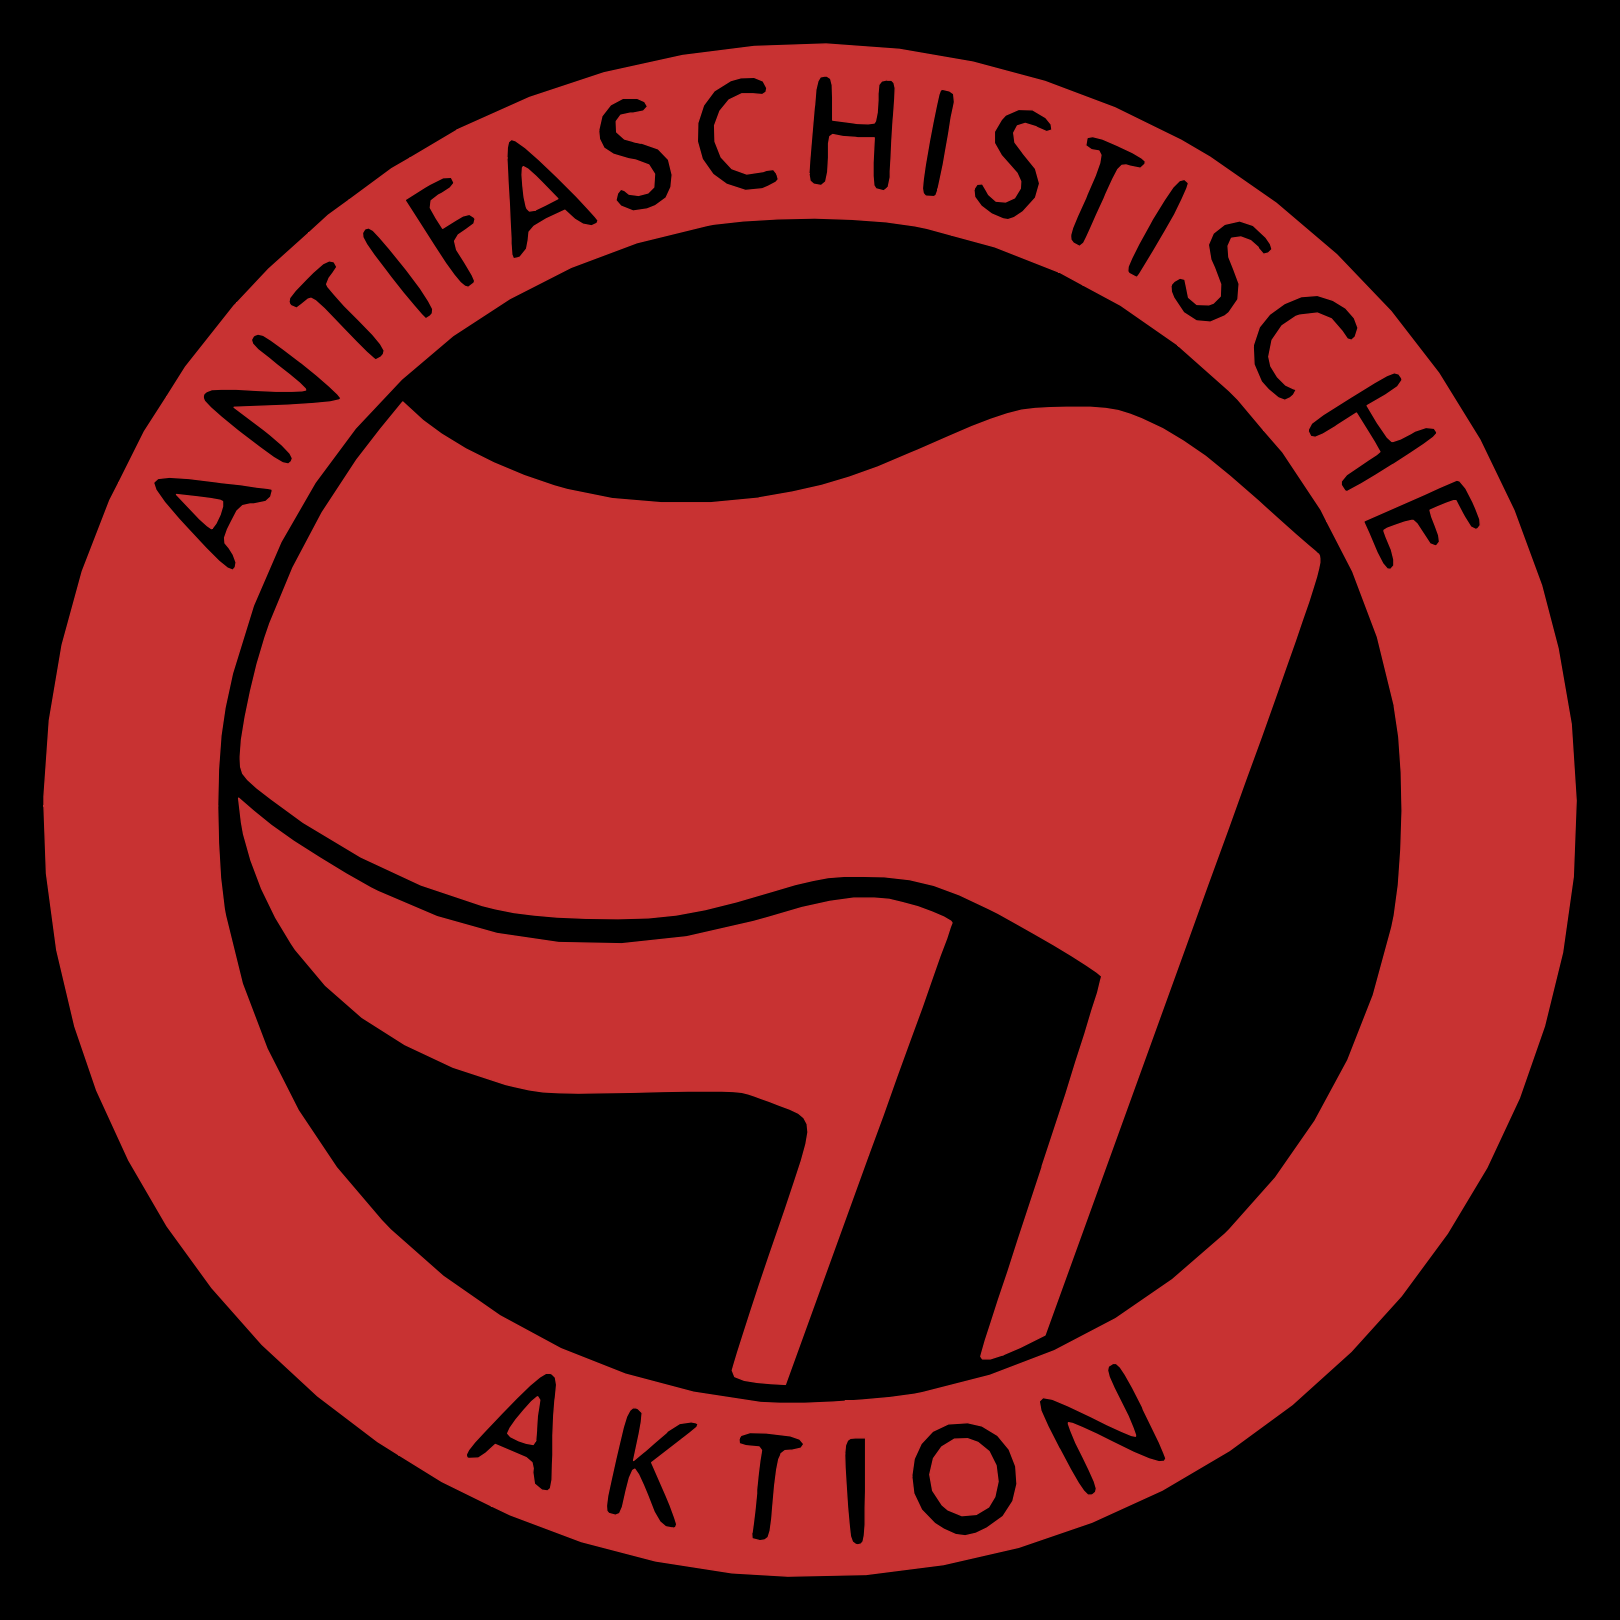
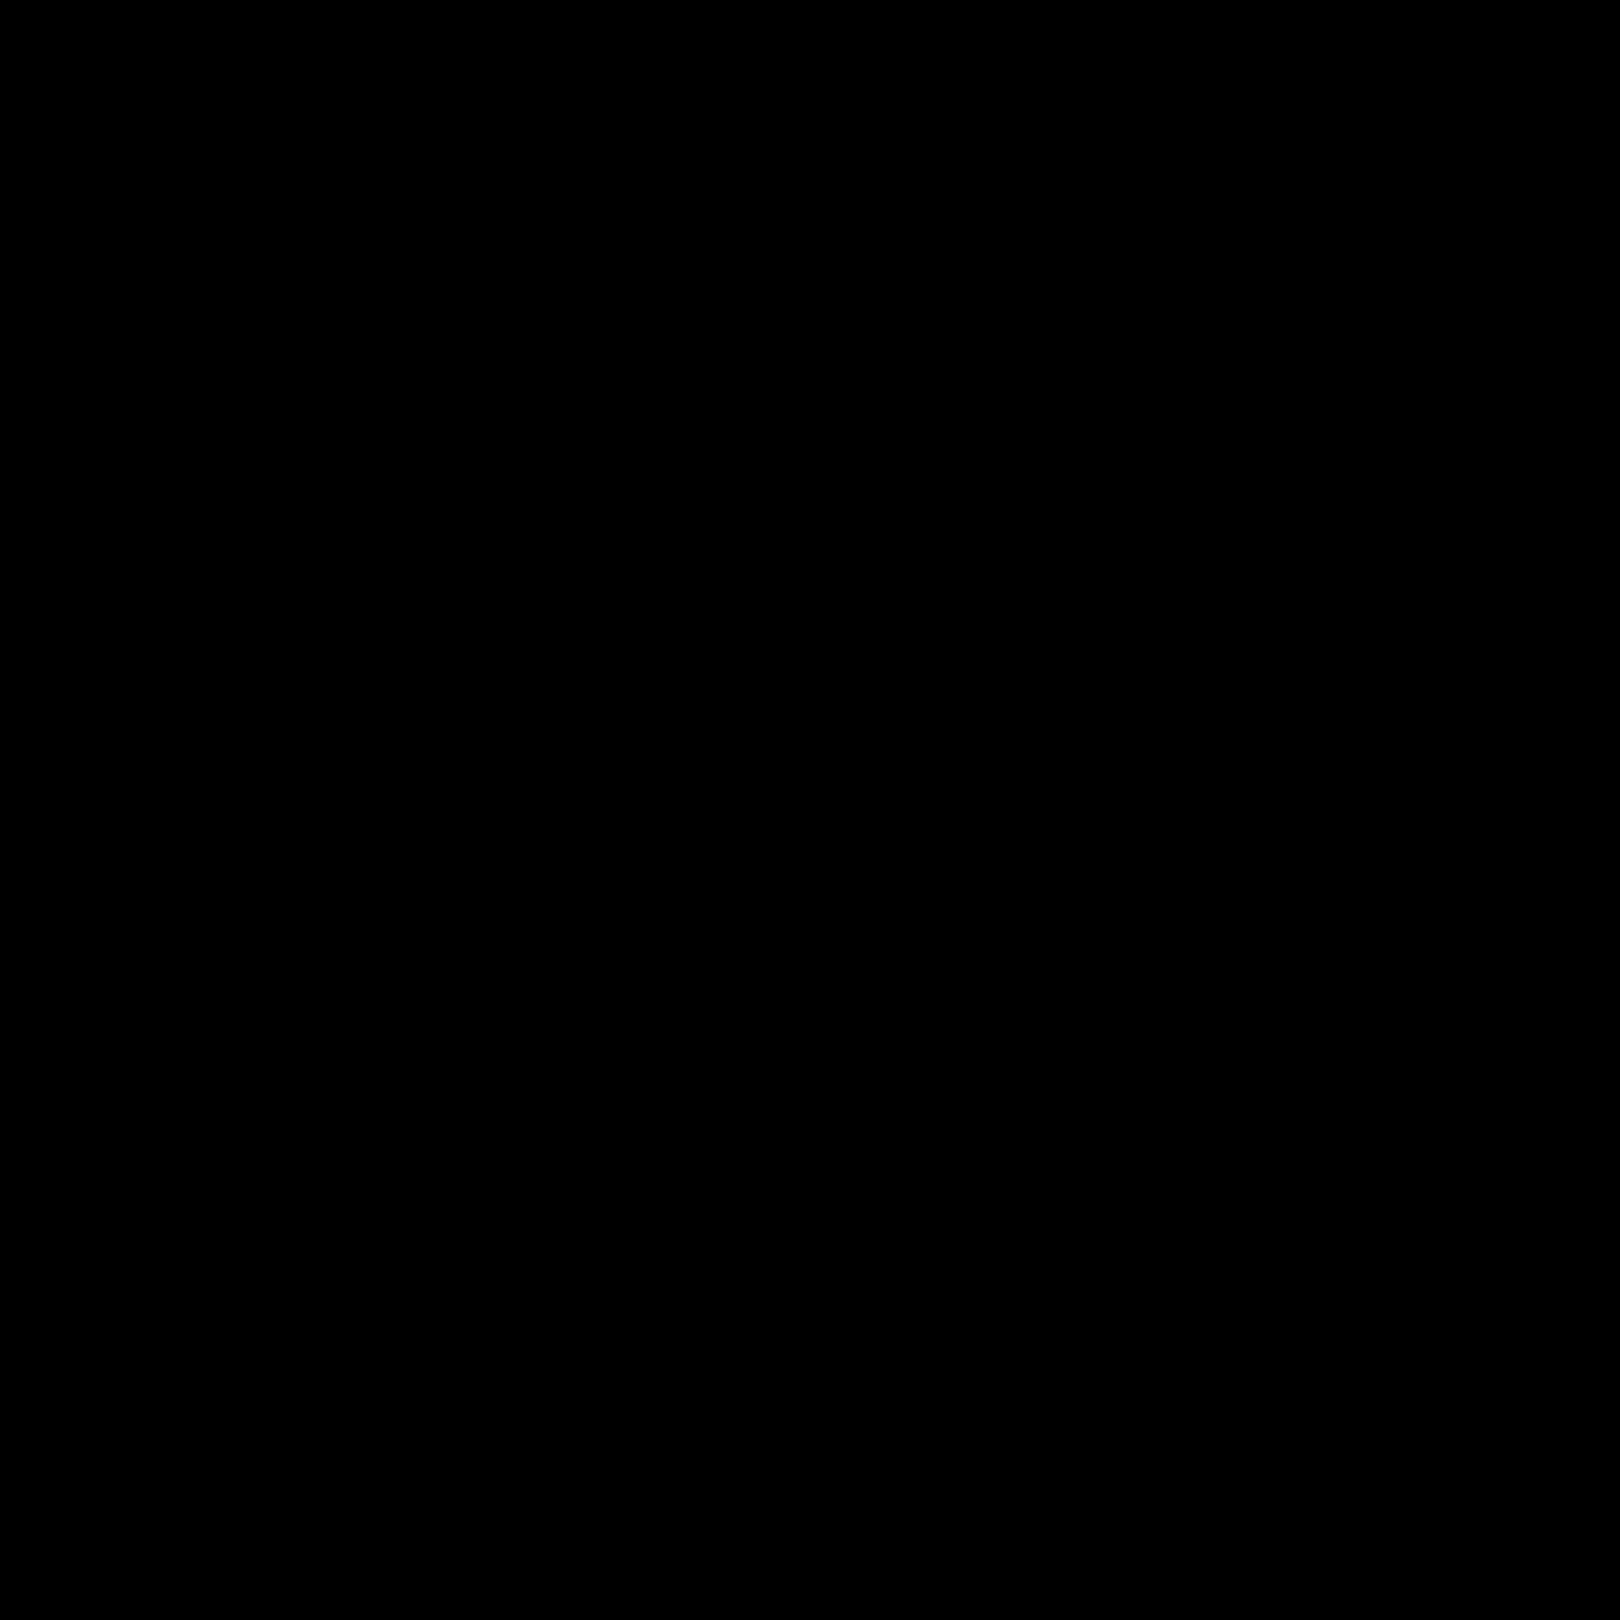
part: (810, 810) -> none

